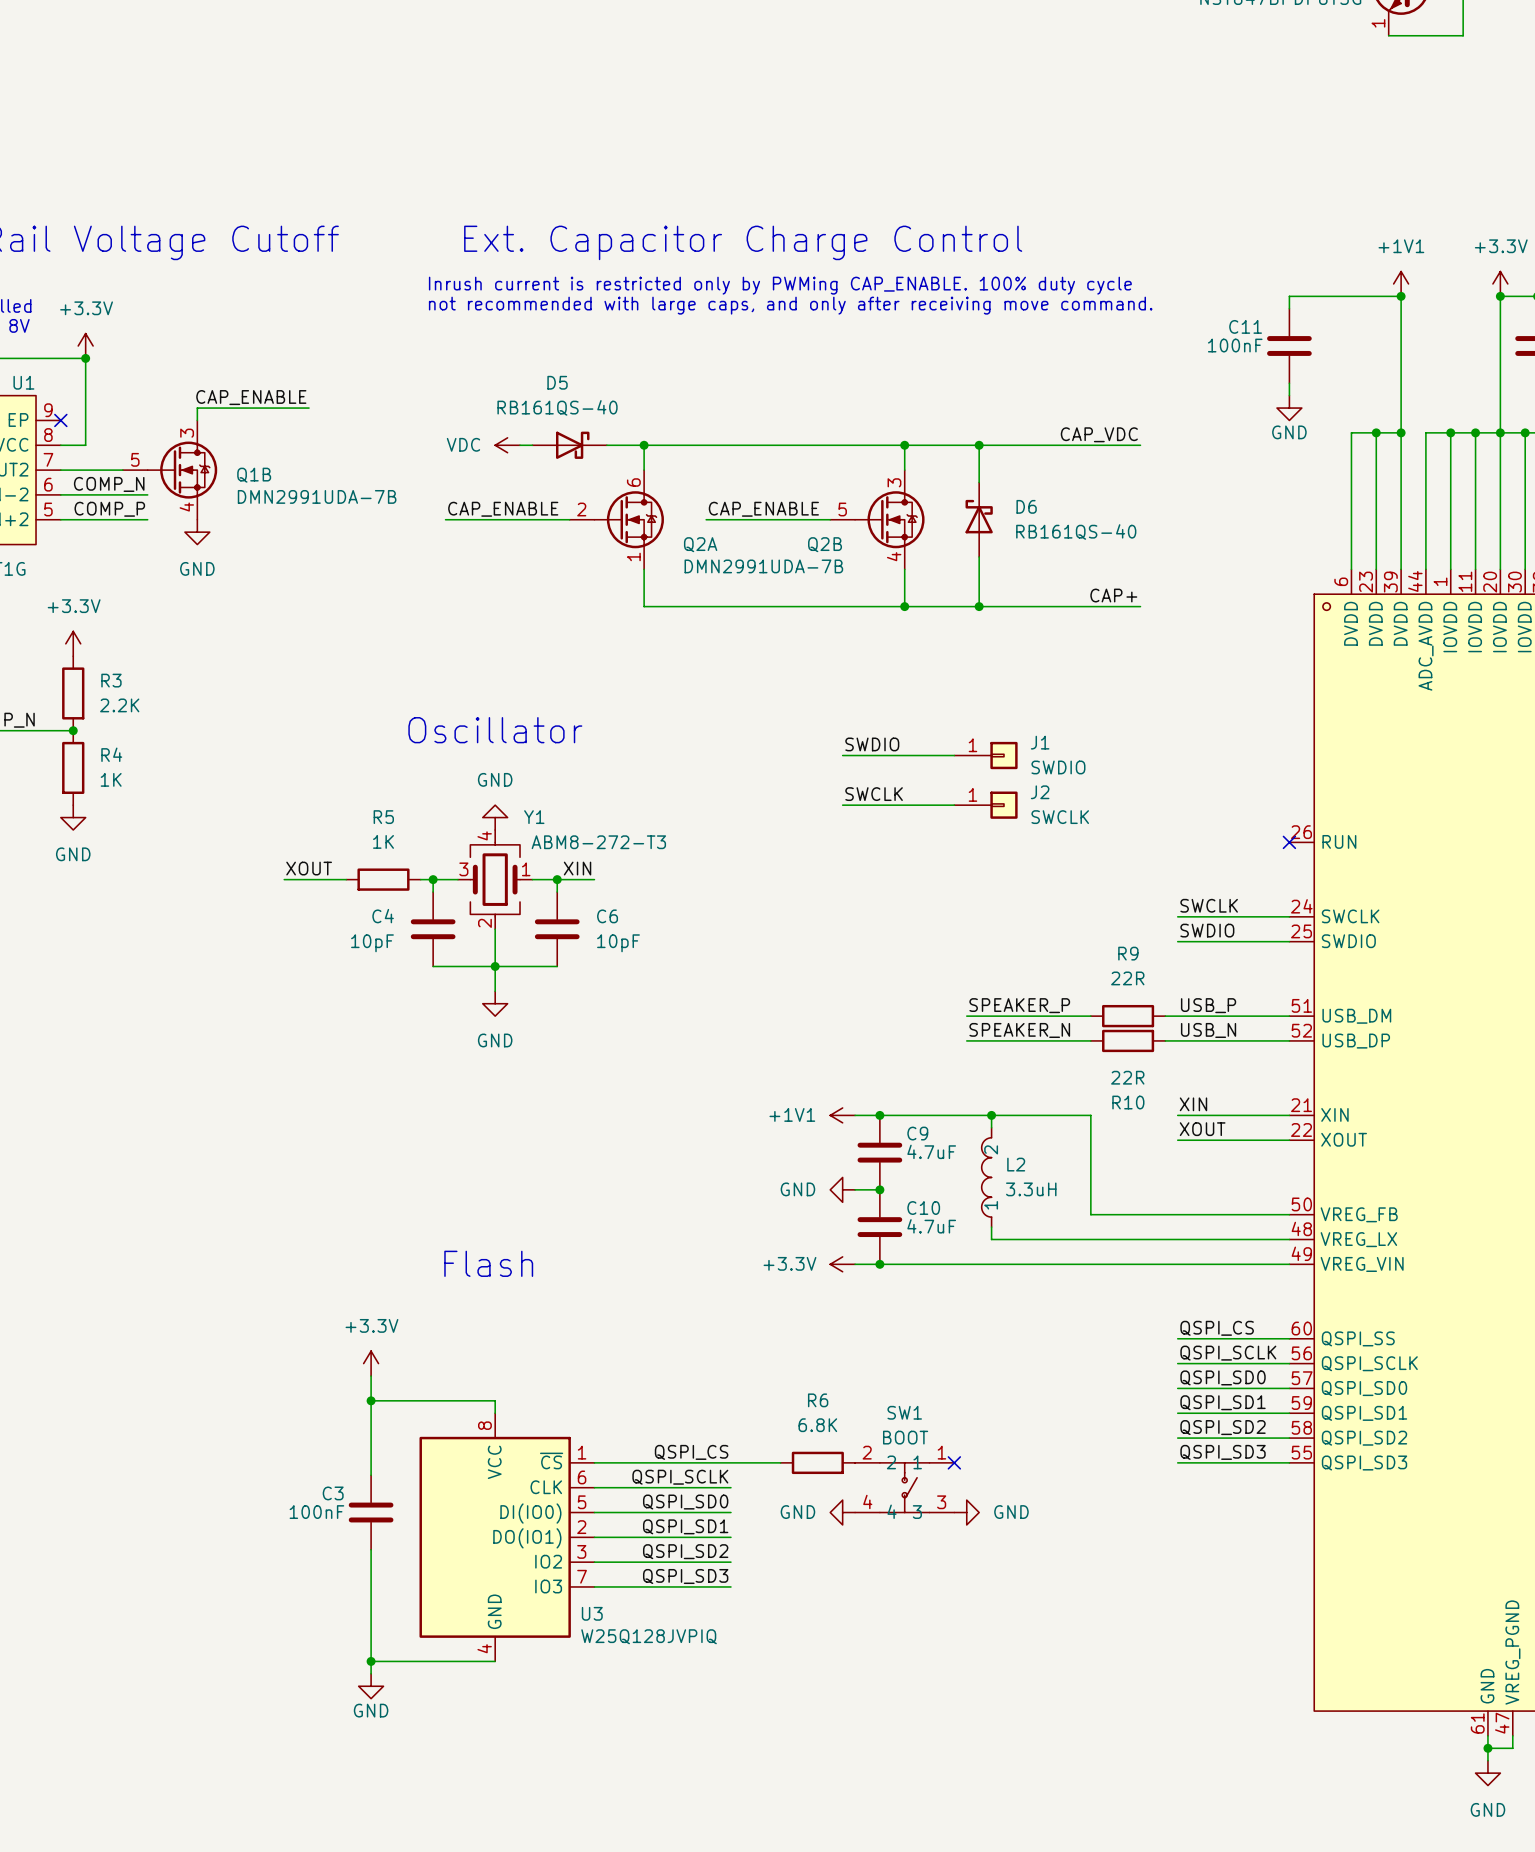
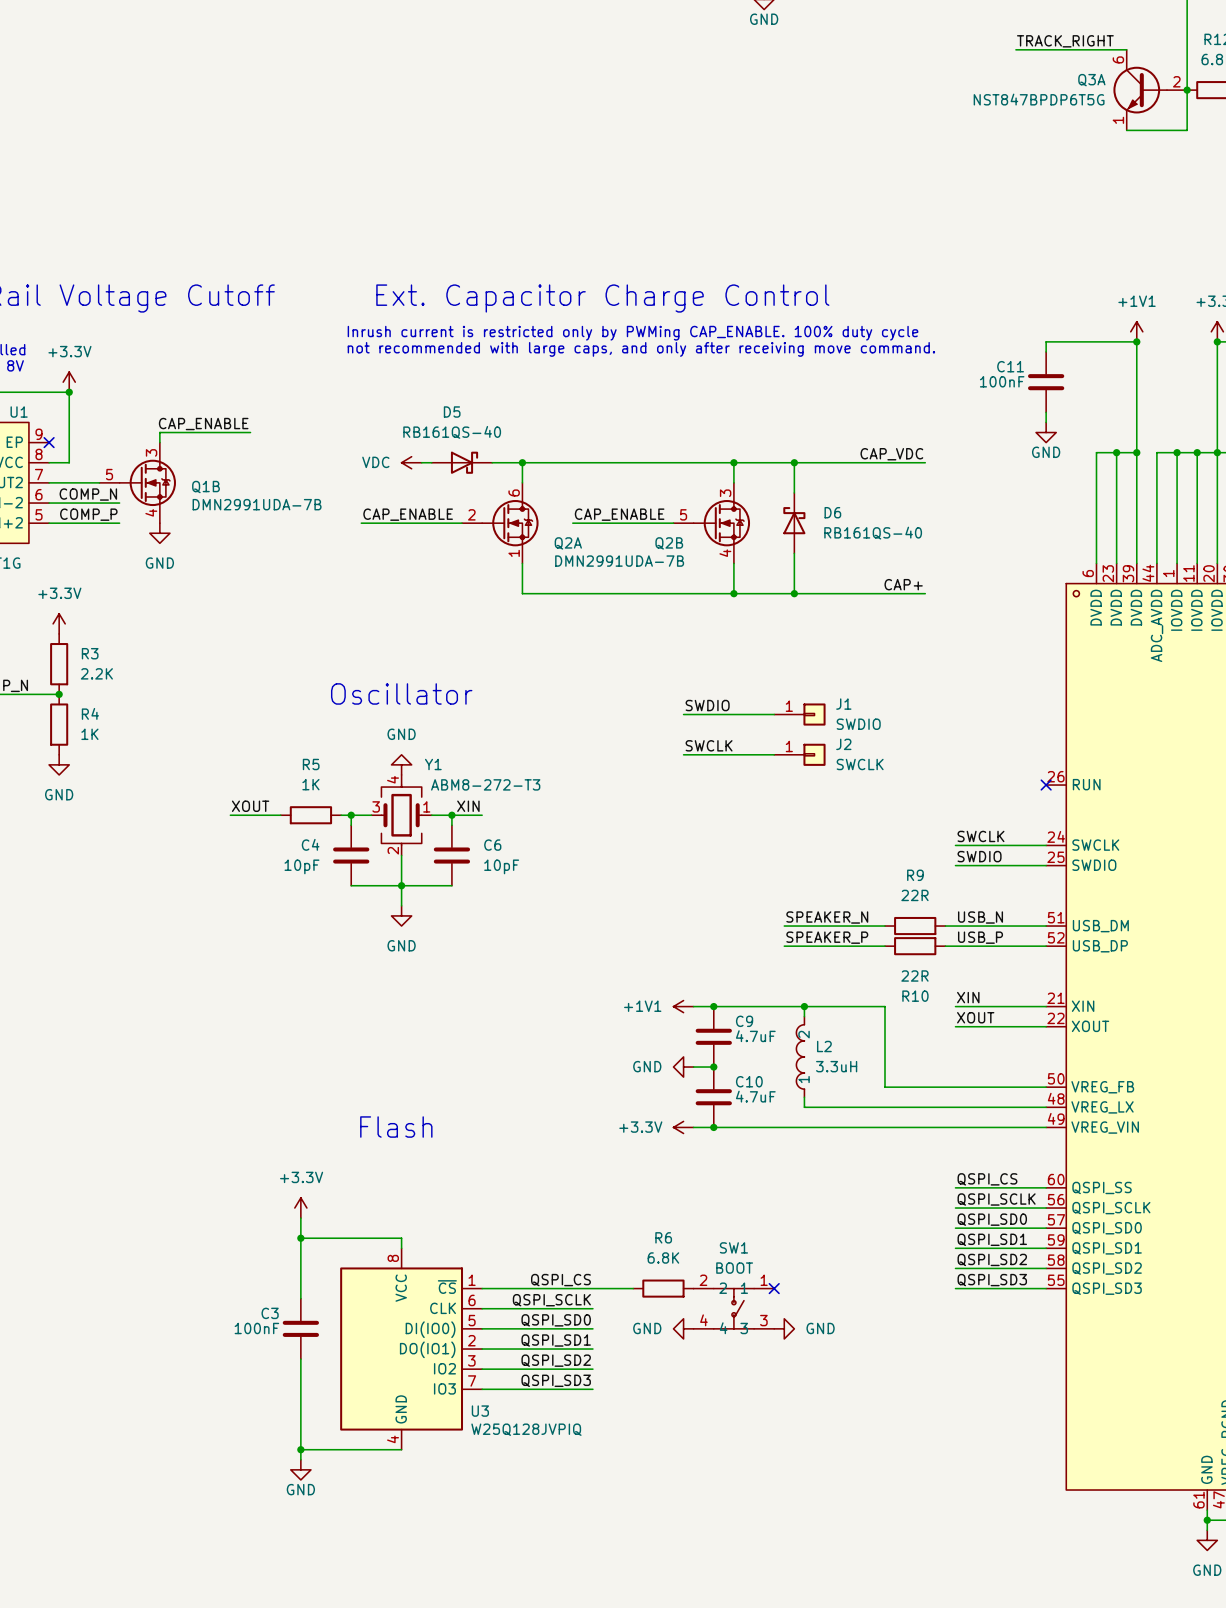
label: SPEAKER_P (1019, 1005) -> SPEAKER_N (827, 917)
label: USB_P (1208, 1005) -> USB_N (980, 917)
label: SPEAKER_N (1019, 1030) -> SPEAKER_P (827, 937)
label: USB_N (1208, 1030) -> USB_P (980, 937)

